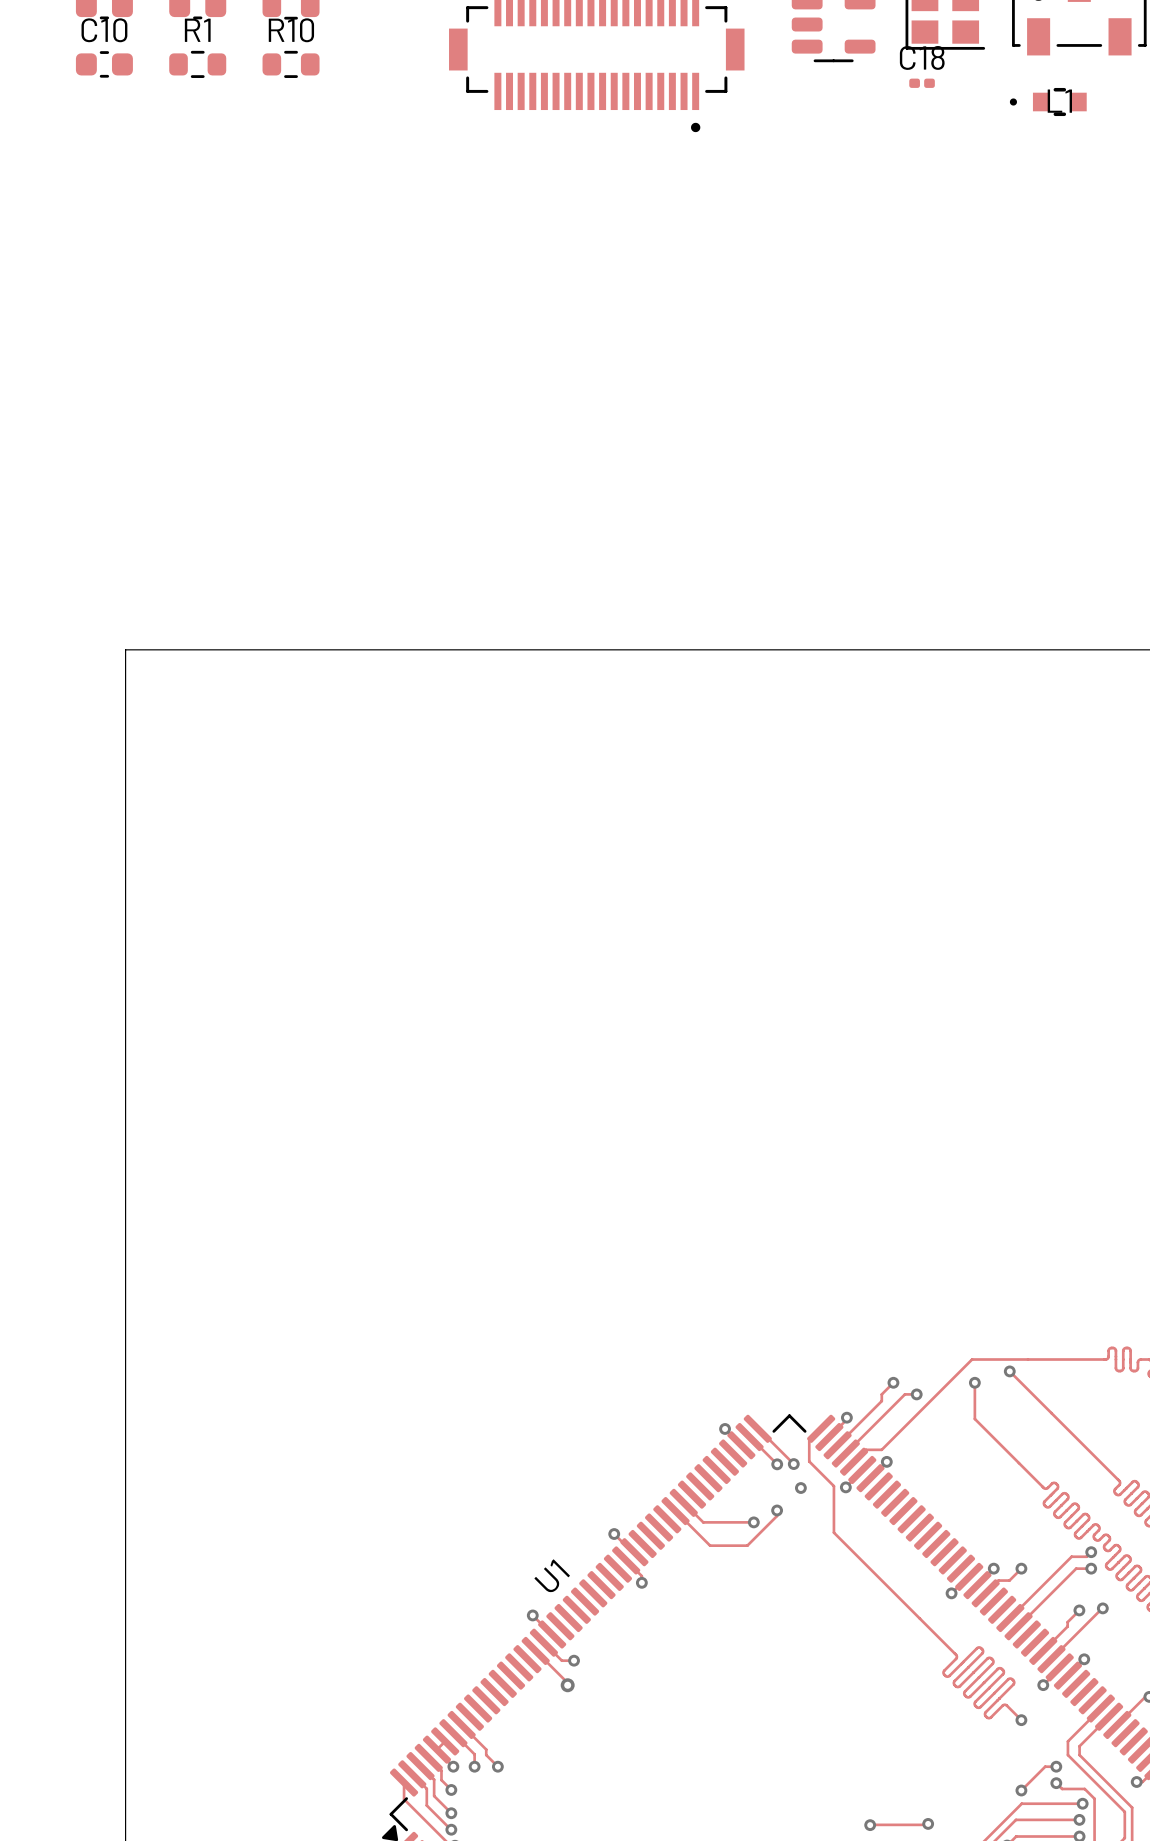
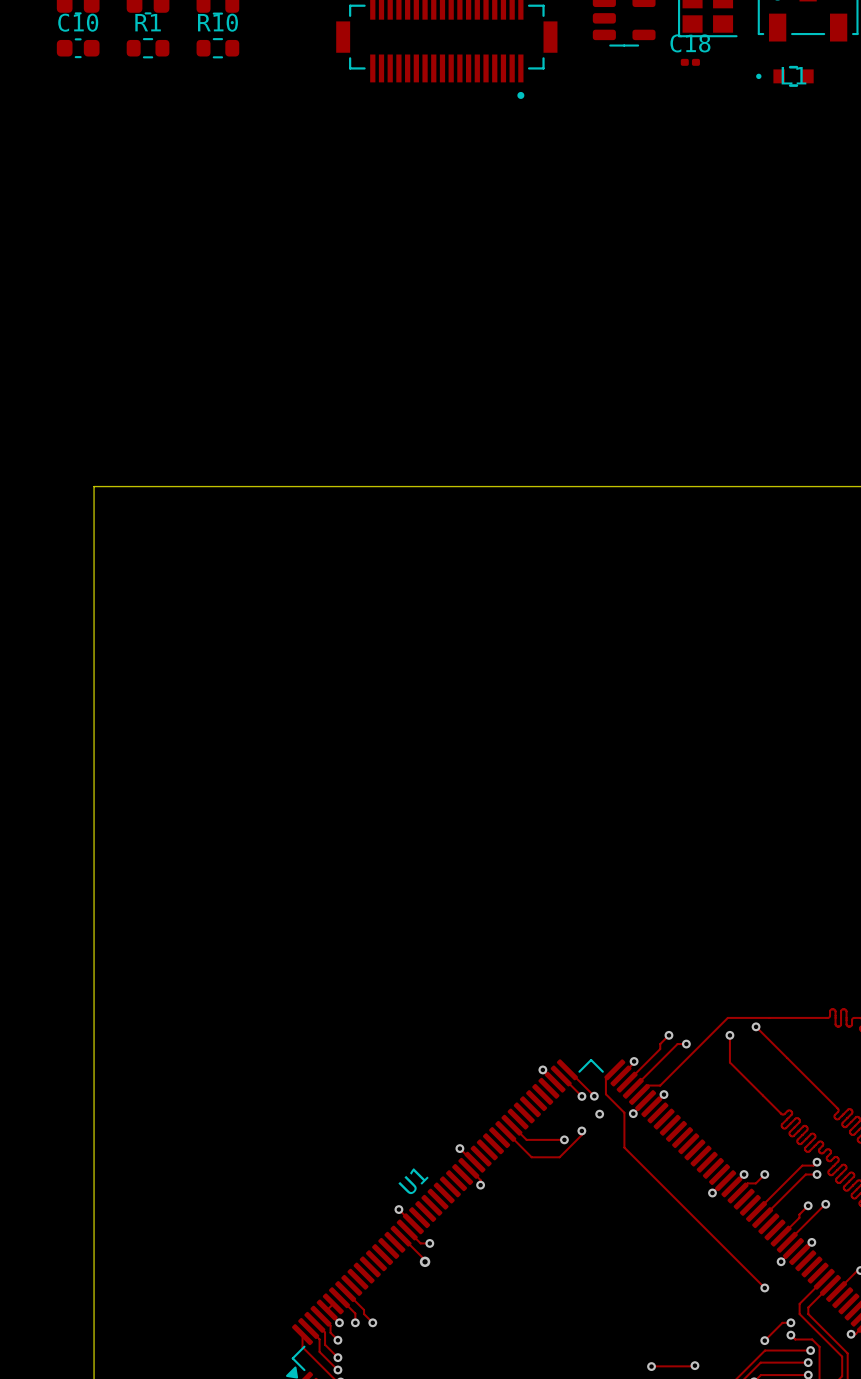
track: (956, 1654) (956, 1658) (943, 1671) (945, 1675) (949, 1676) (977, 1648) (980, 1647) (982, 1653) (954, 1680) (954, 1684) (959, 1686) (987, 1658) (990, 1657) (993, 1660) (992, 1663) (965, 1691) (964, 1694) (970, 1696) (1000, 1668) (1003, 1670) (1003, 1673) (974, 1704) (977, 1707) (980, 1707) (1010, 1678) (1013, 1680) (1013, 1684) (985, 1712) (985, 1715) (990, 1717) (1002, 1705) (1006, 1705) -> (715, 1239) (753, 1277)

